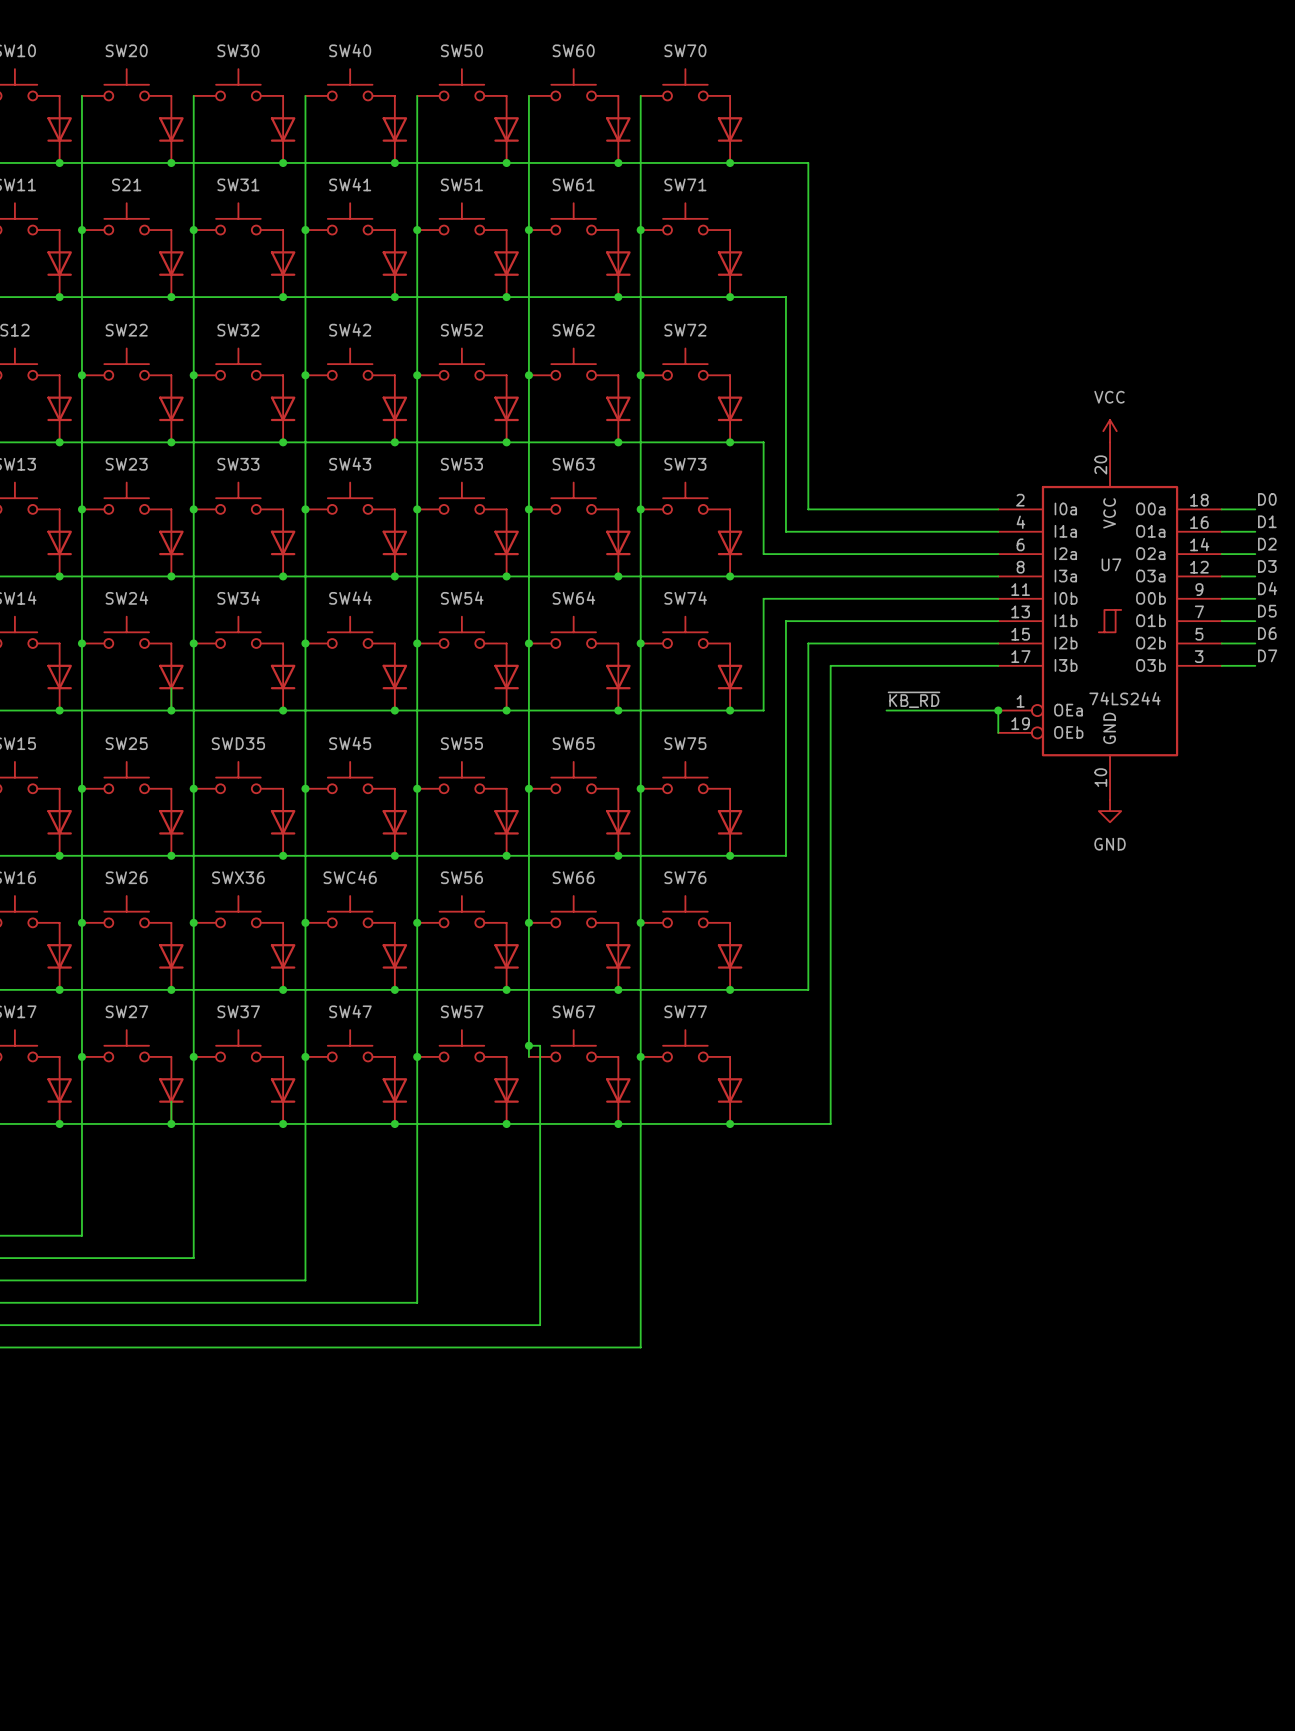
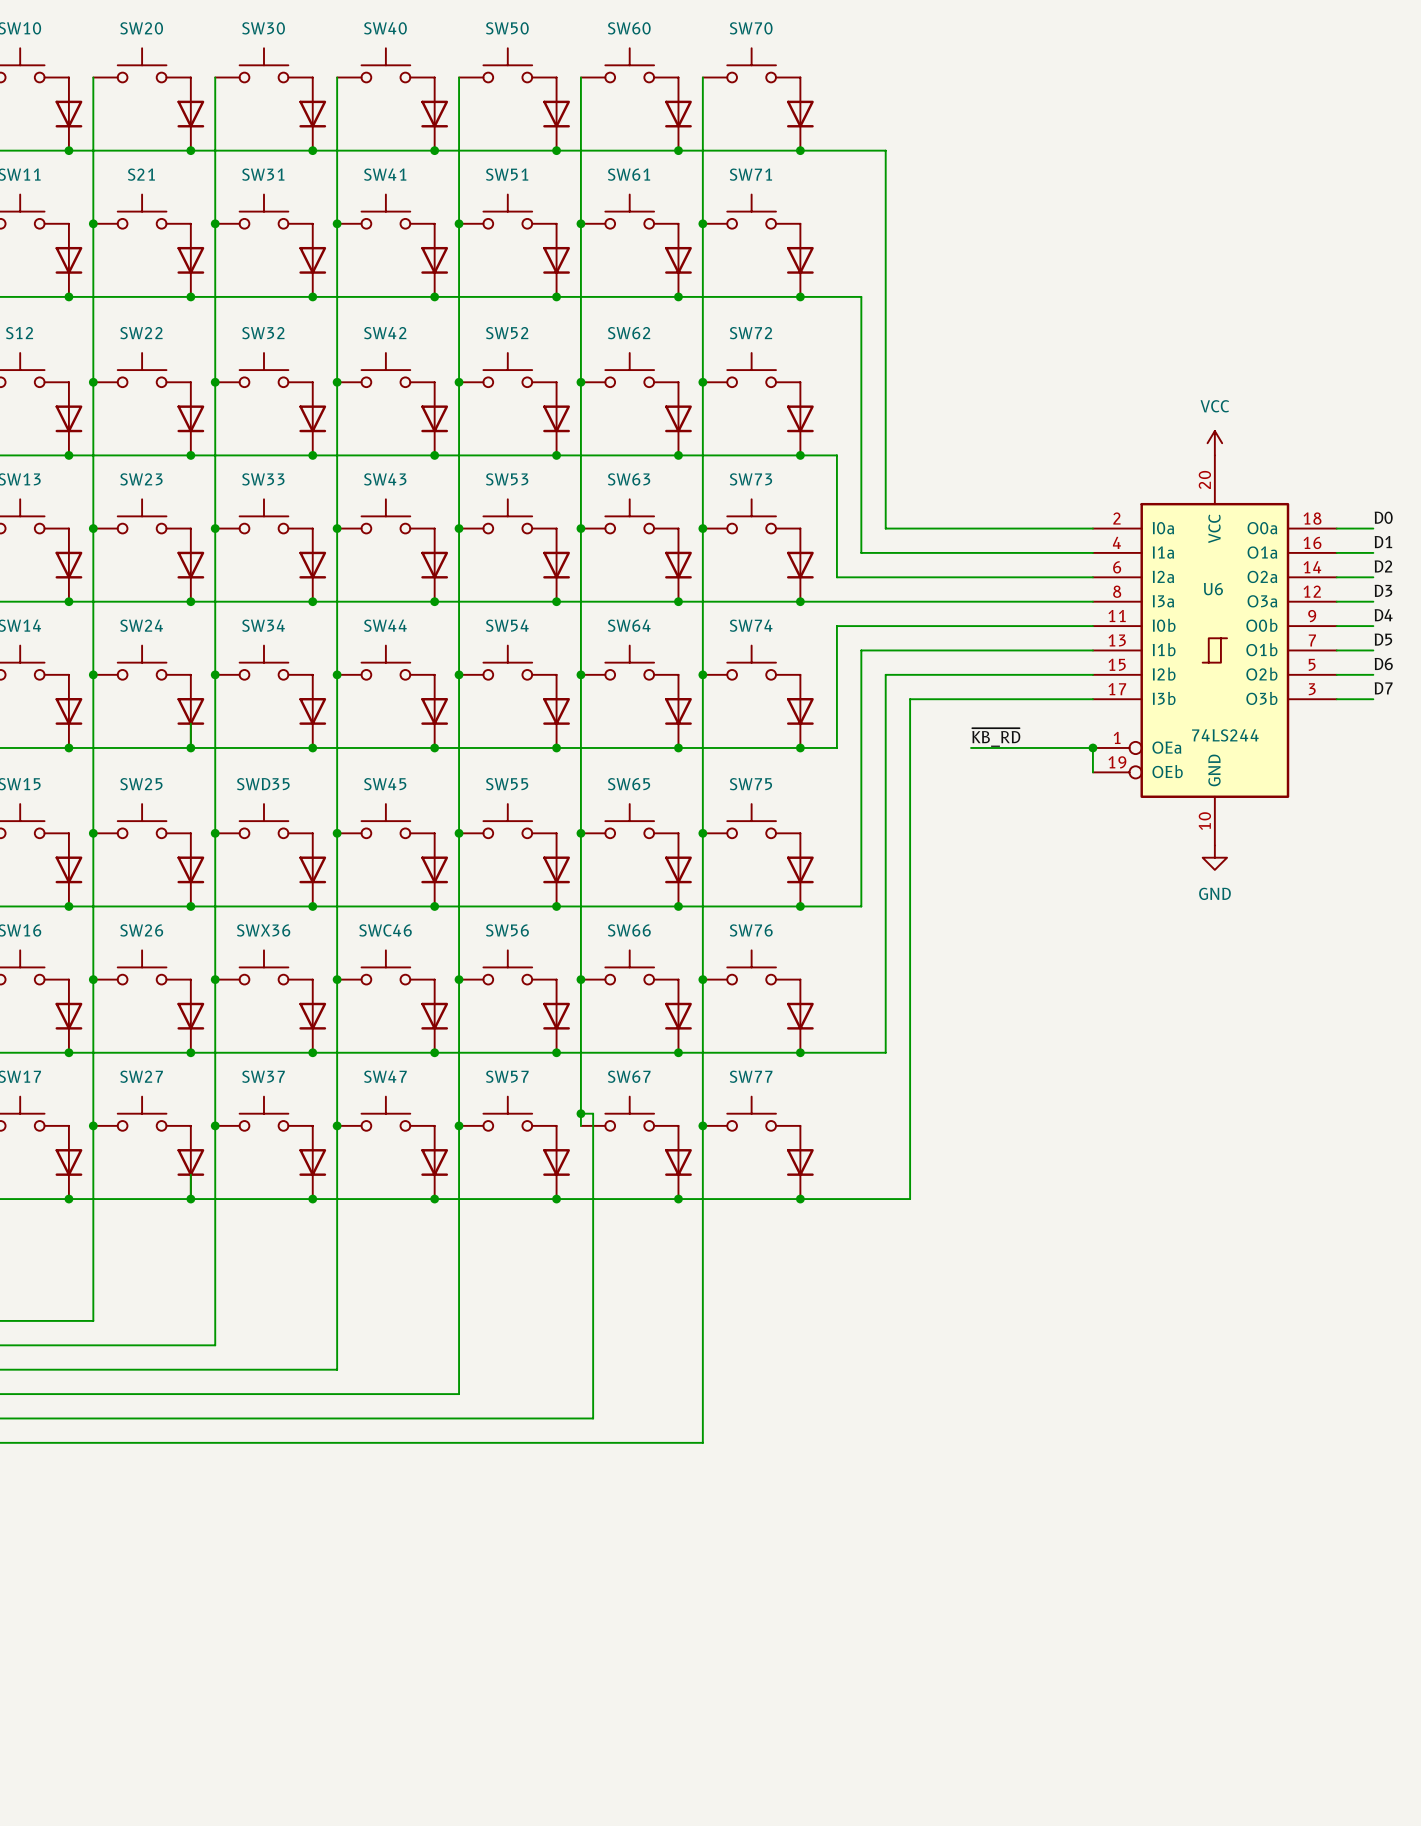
U7 name: U7 (1111, 564) -> U6 (1213, 589)

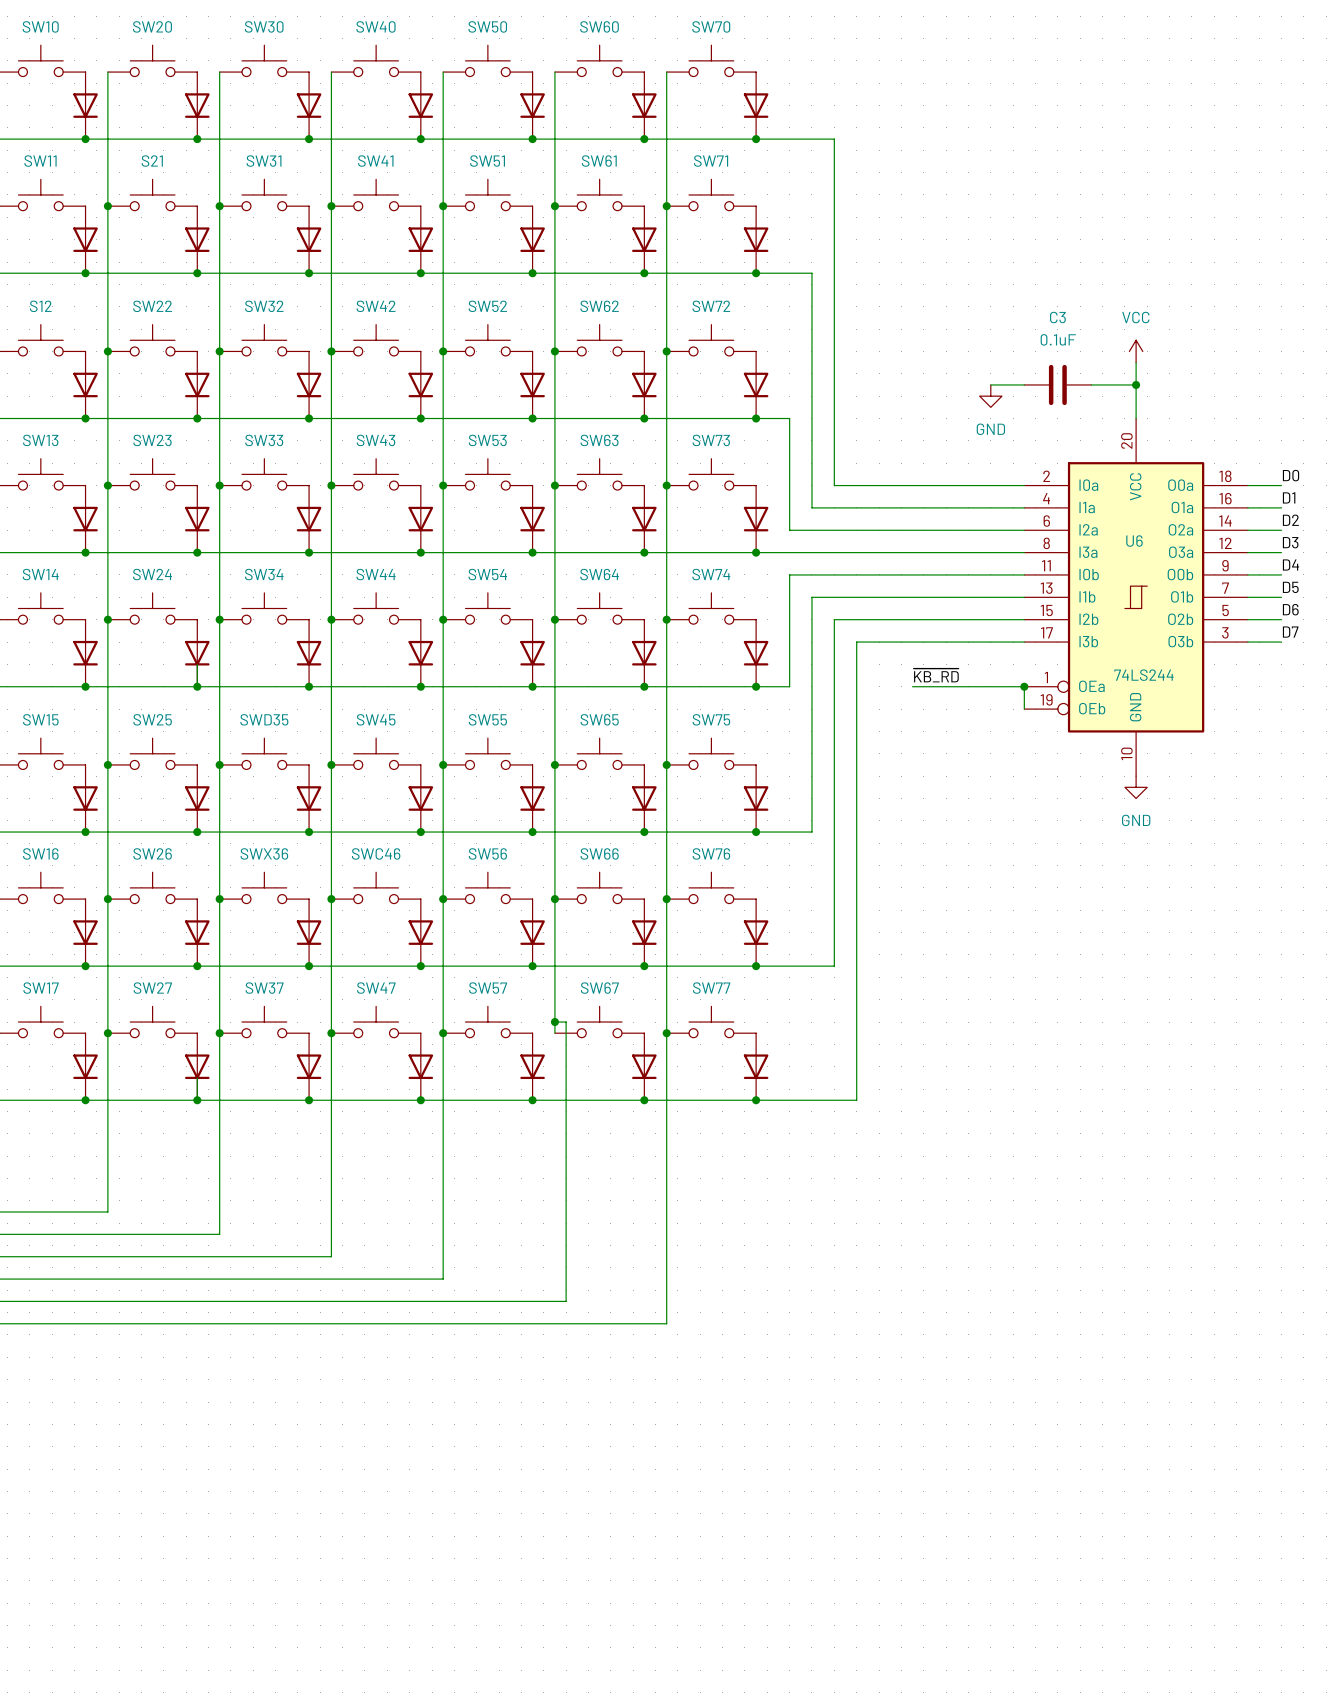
wire: none -> (1136, 362) (1136, 418)
wire: none -> (990, 384) (1024, 384)
C3: none -> 0.1uF (1057, 384)
wire: none -> (1091, 384) (1136, 384)
junction: none -> (1136, 384)
power symbol: none -> GND (990, 396)
power symbol position: VCC (1214, 443) -> VCC (1136, 351)

